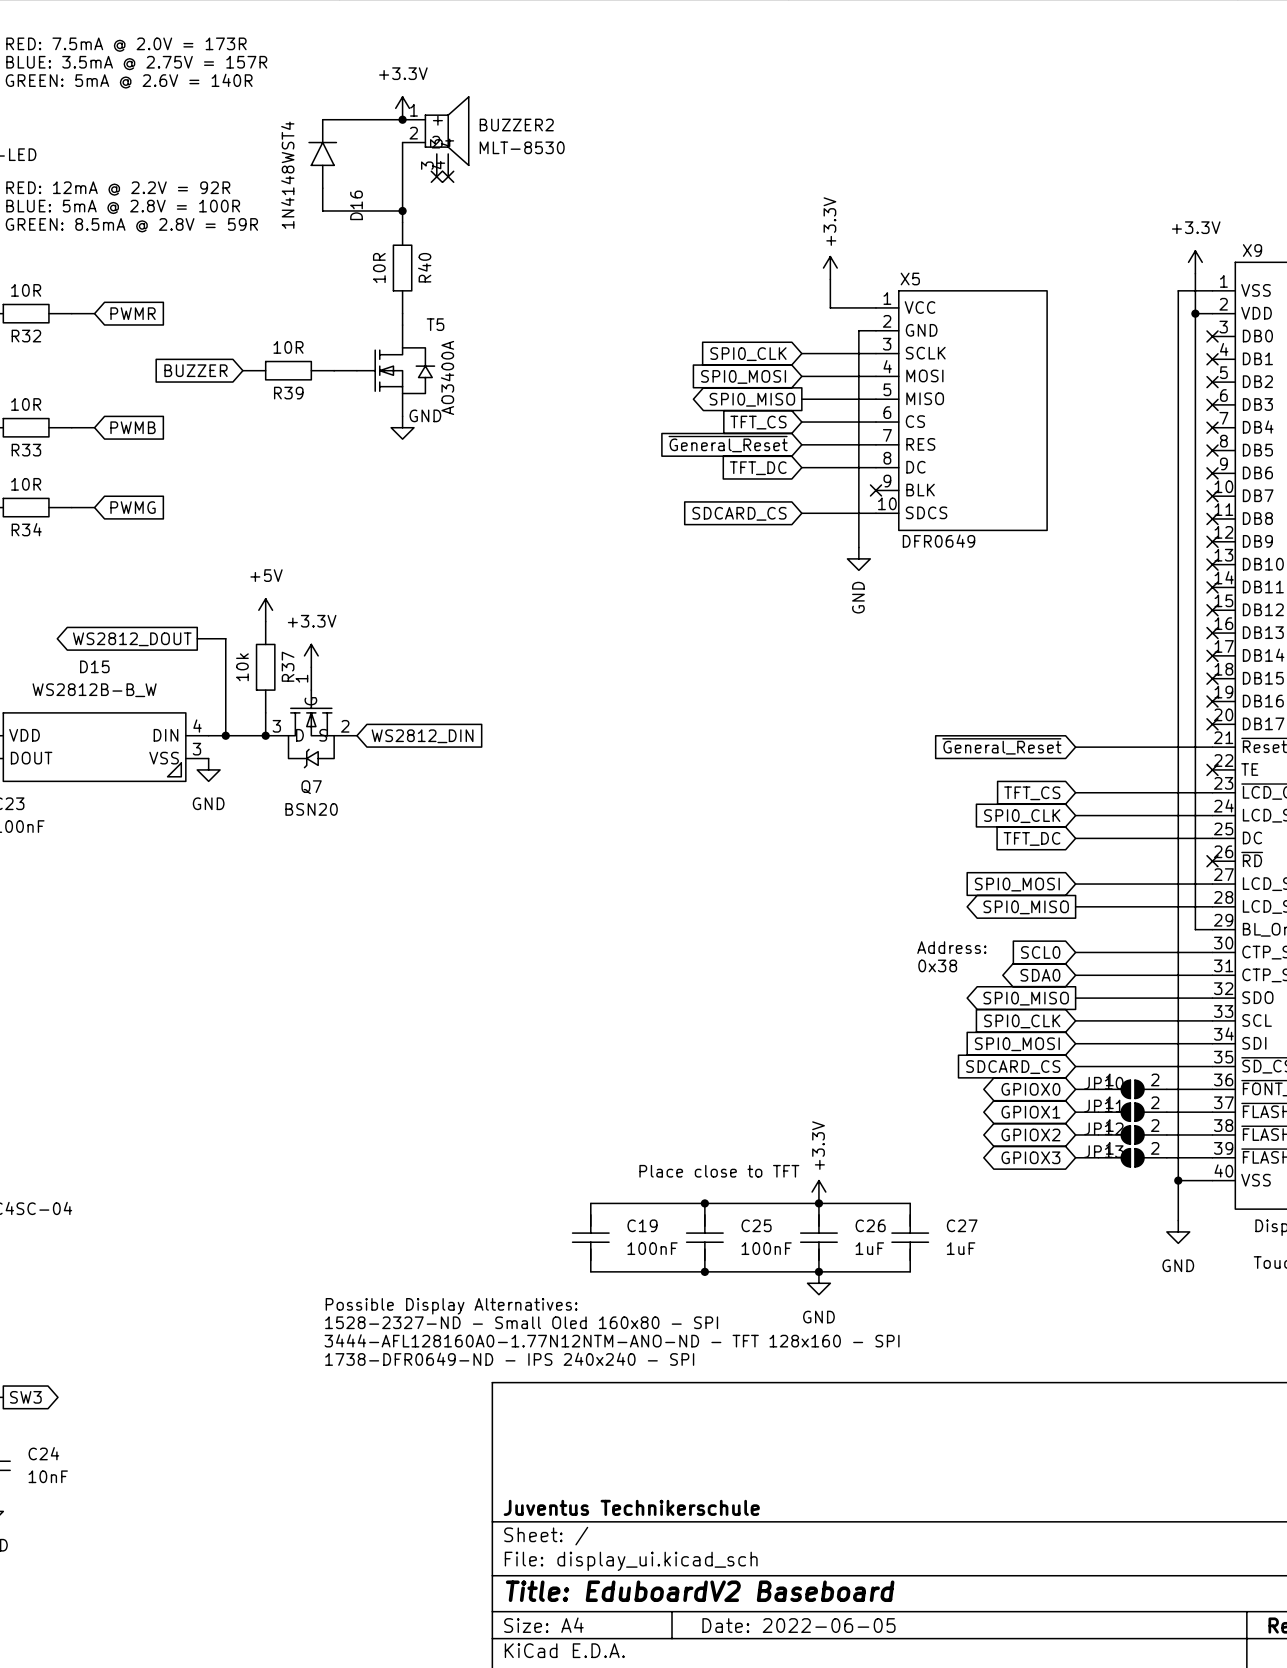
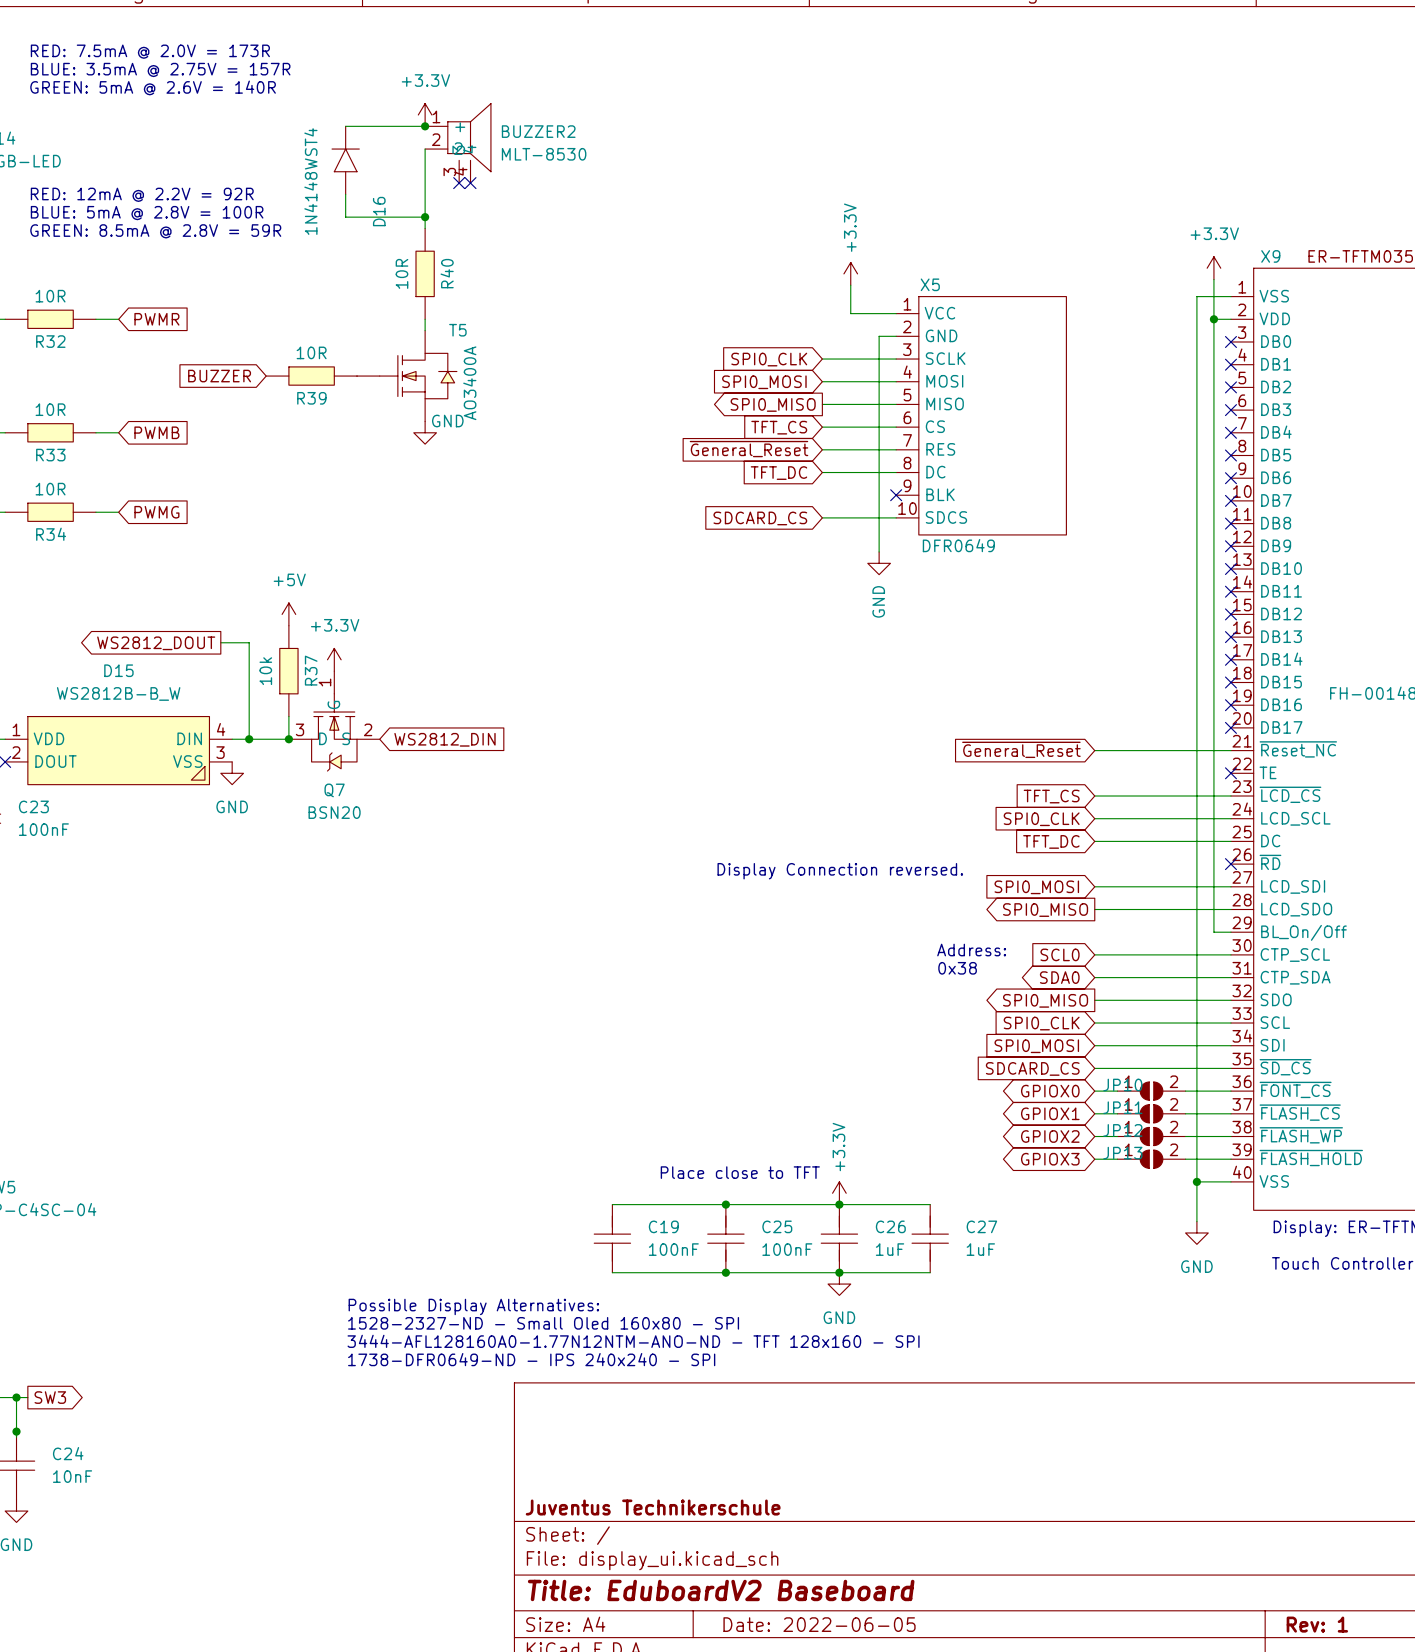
text: none -> Display Connection reversed. (840, 871)

